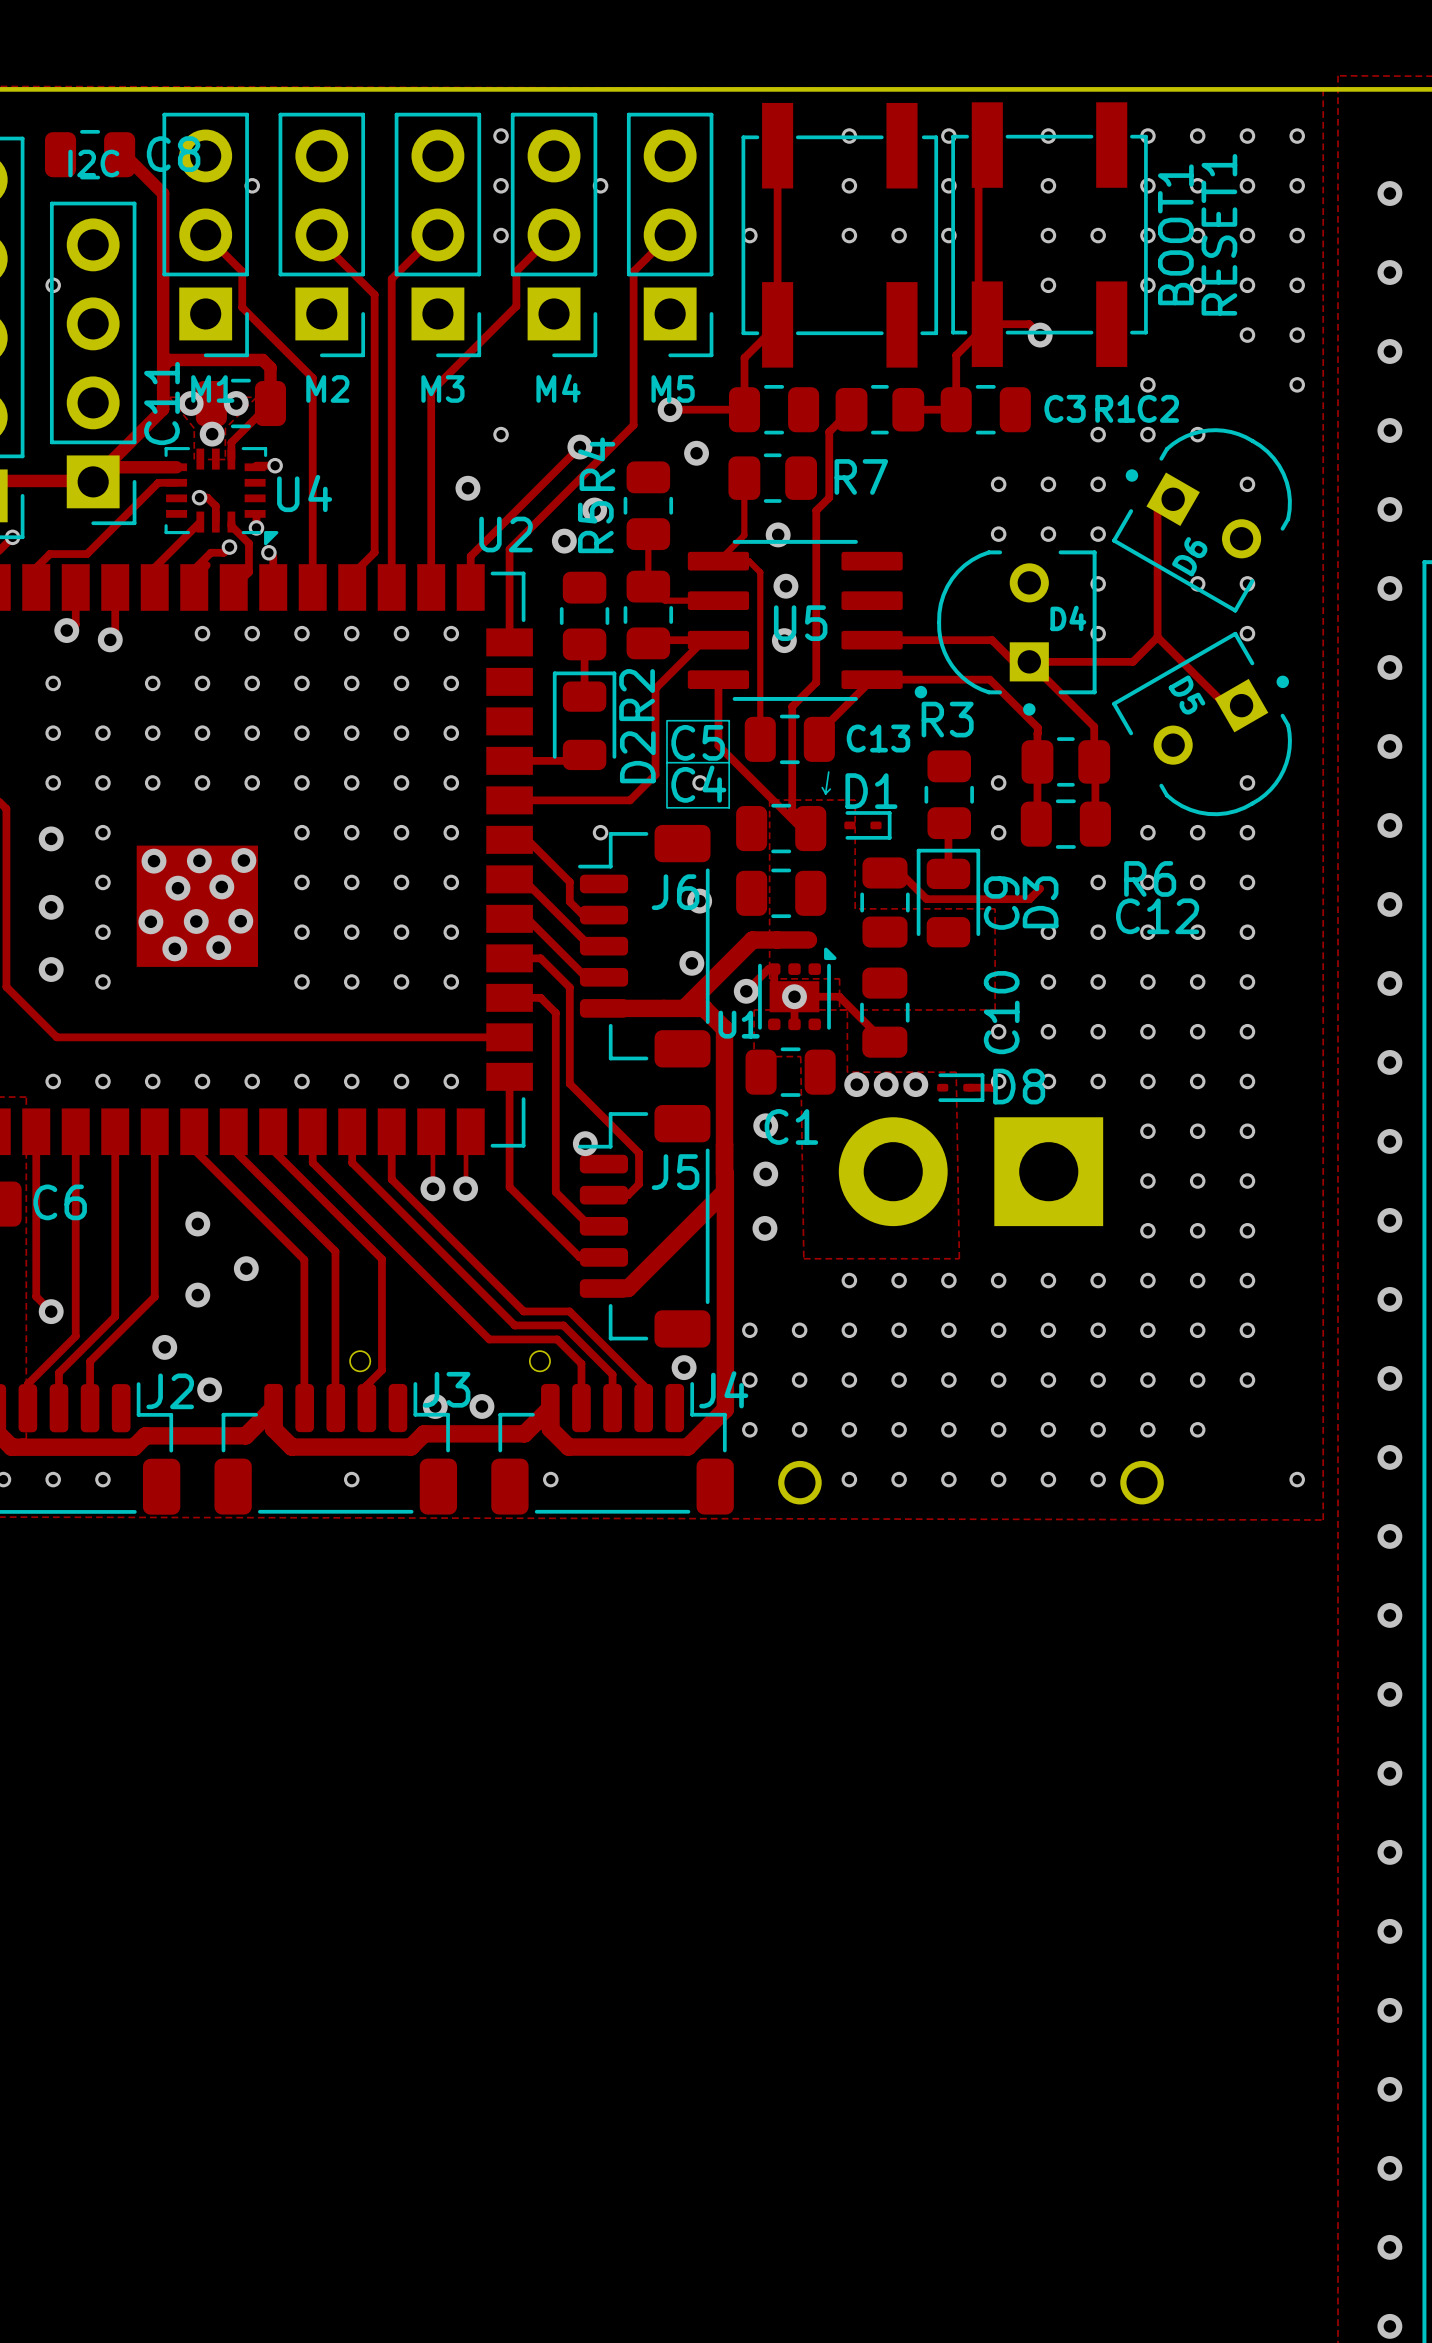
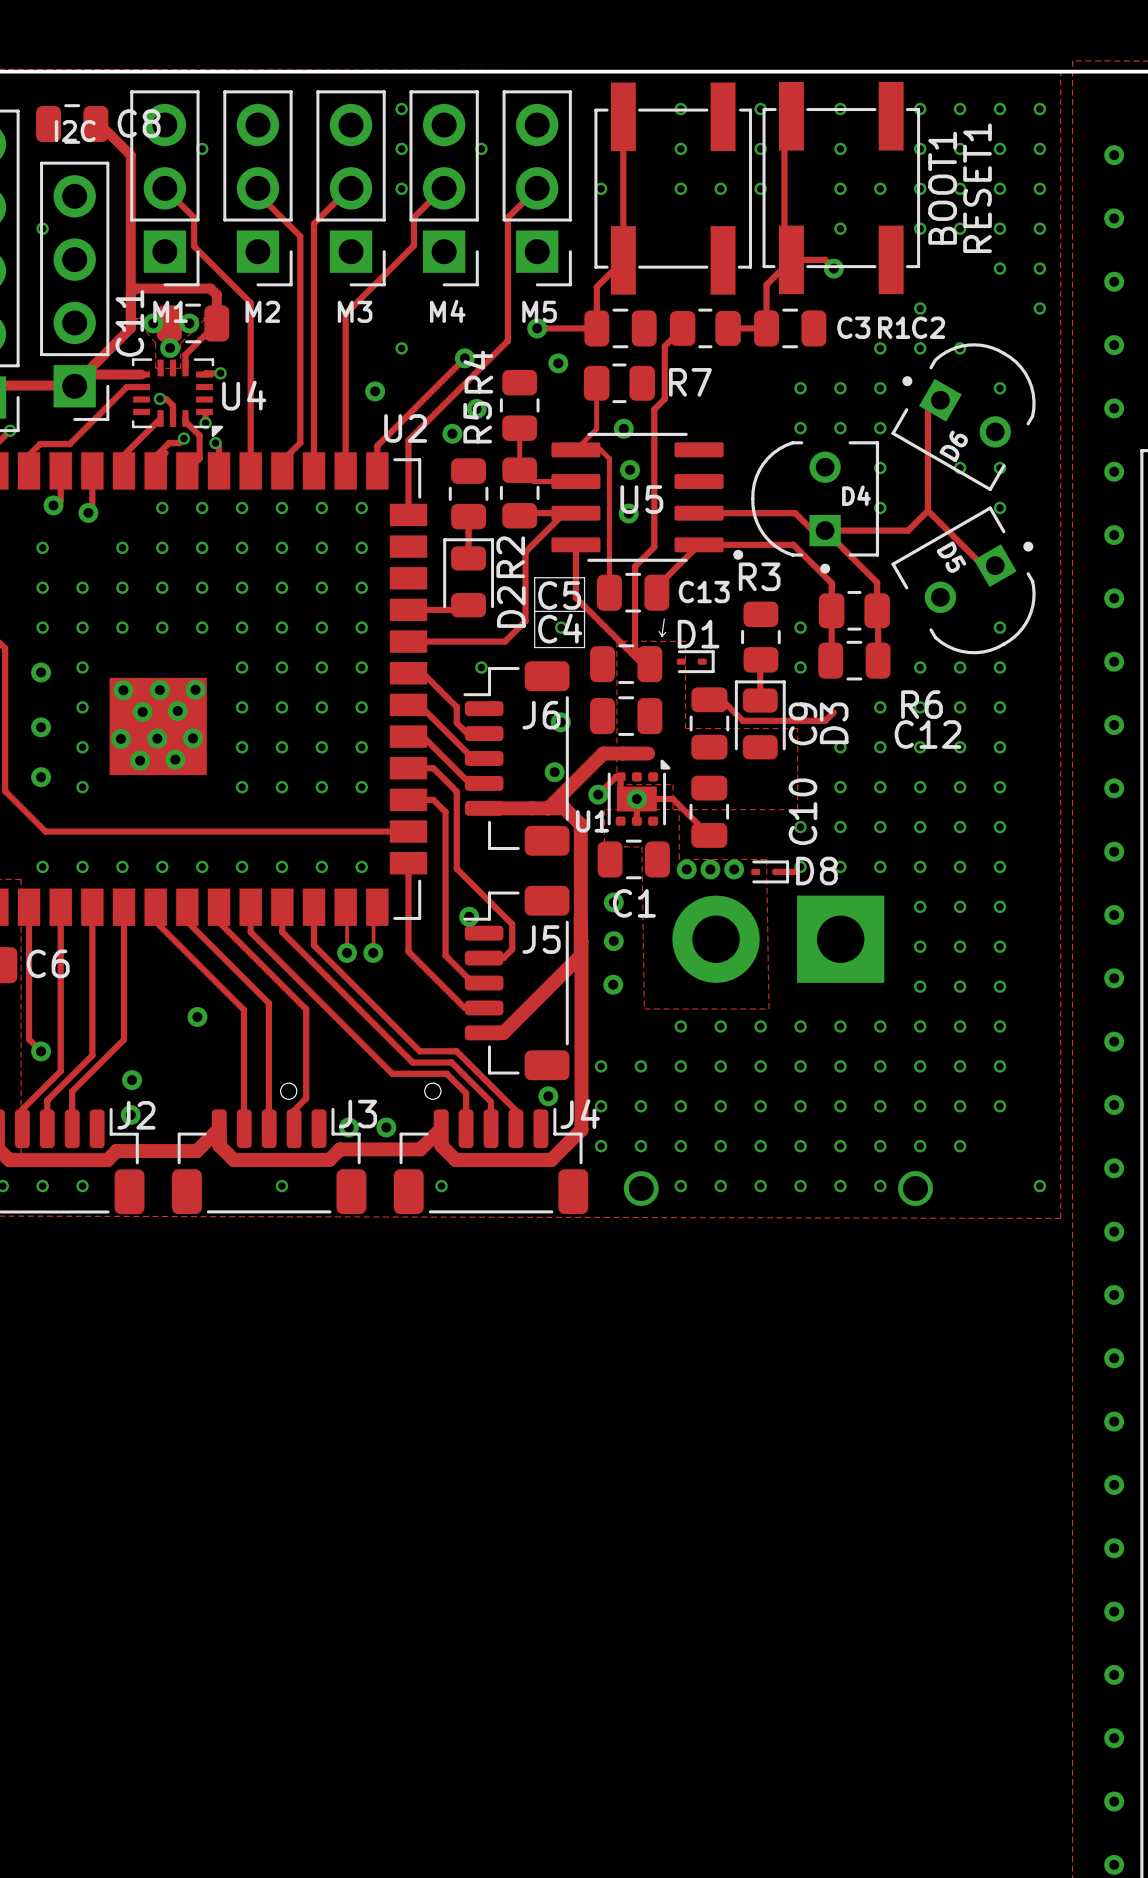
via: (197, 1223) -> none
via: (197, 1295) -> none
via position: (209, 1389) -> (130, 1115)

